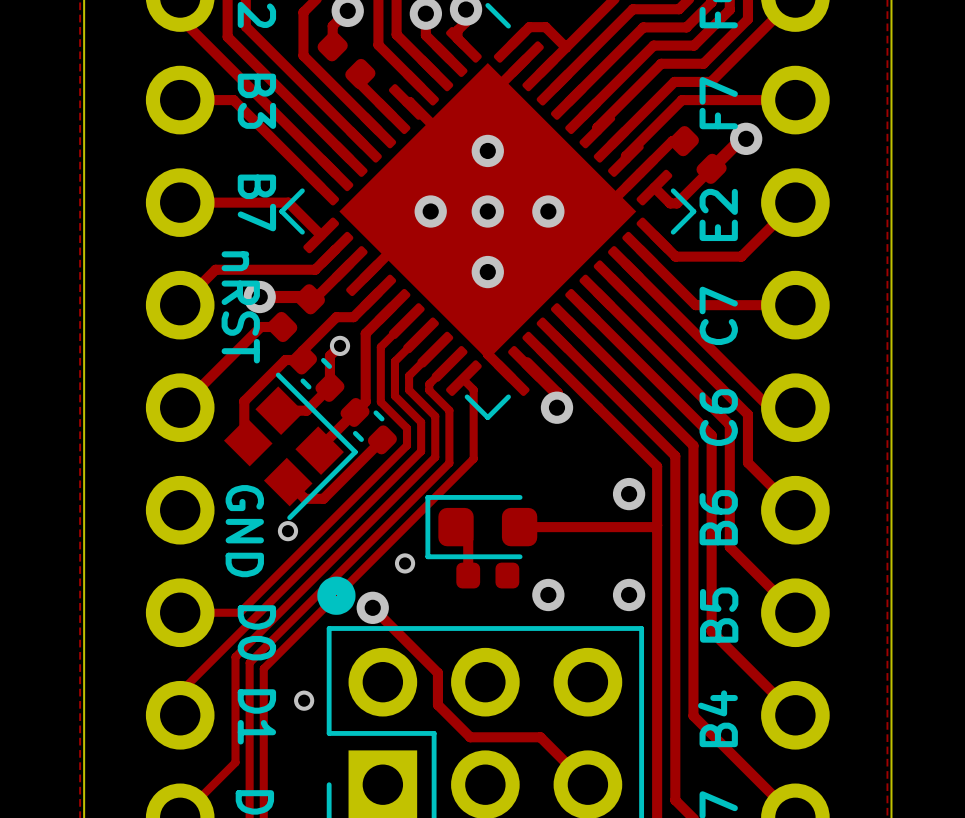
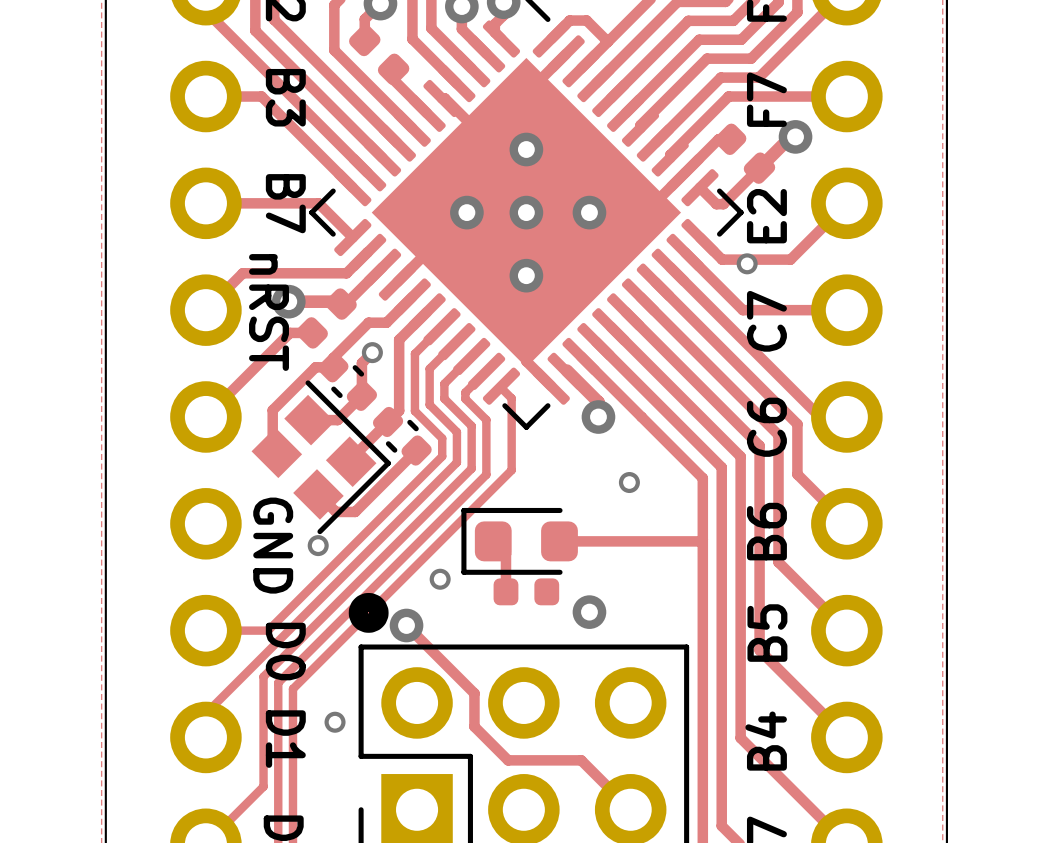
via: none -> (747, 263)
via: none -> (629, 482)
via: (629, 494) -> none
via: (629, 594) -> none

